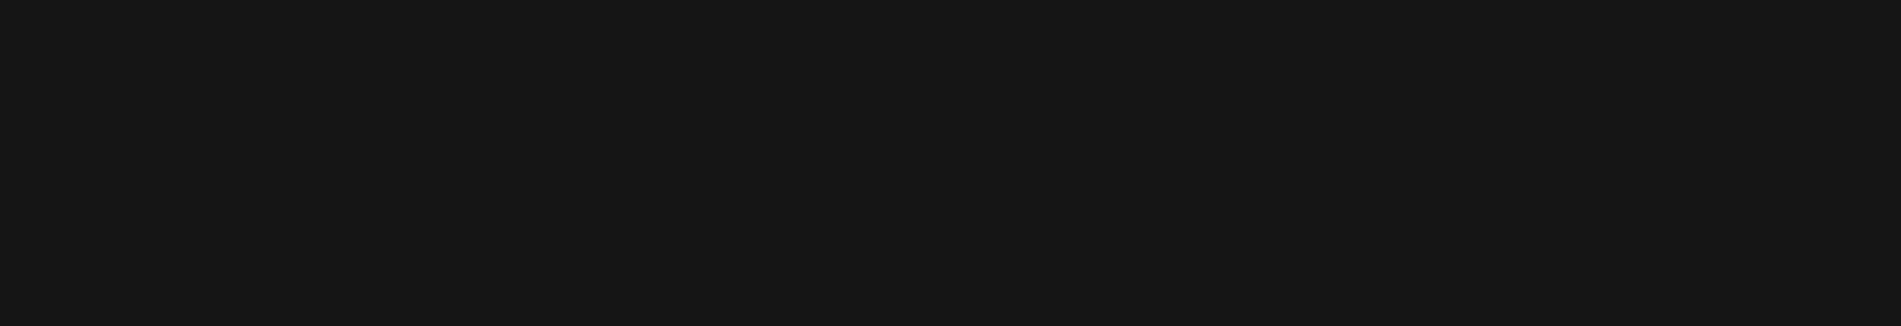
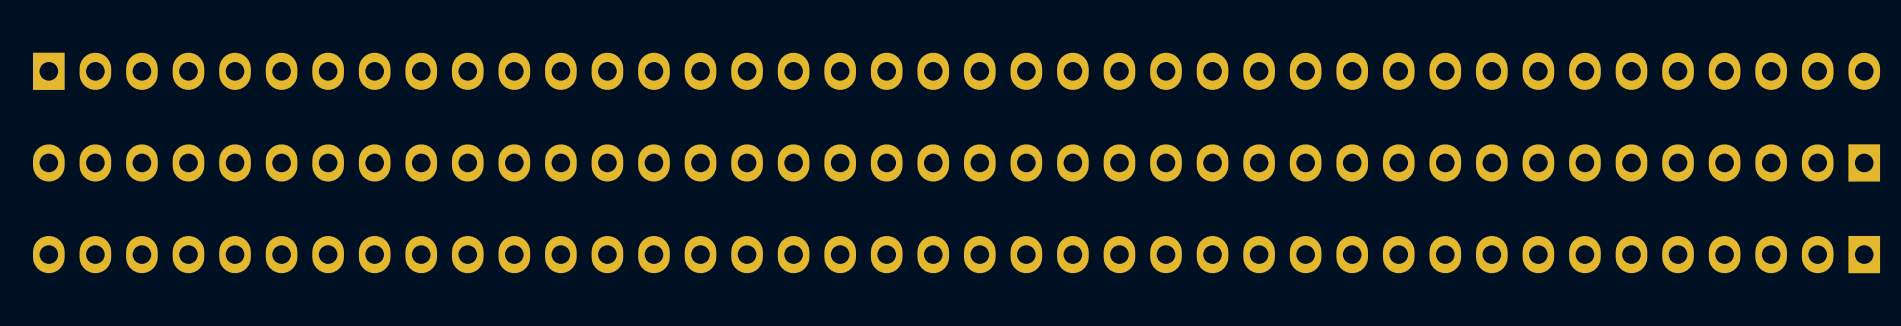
part: none -> (956, 71)
part: none -> (956, 162)
part: none -> (956, 254)

